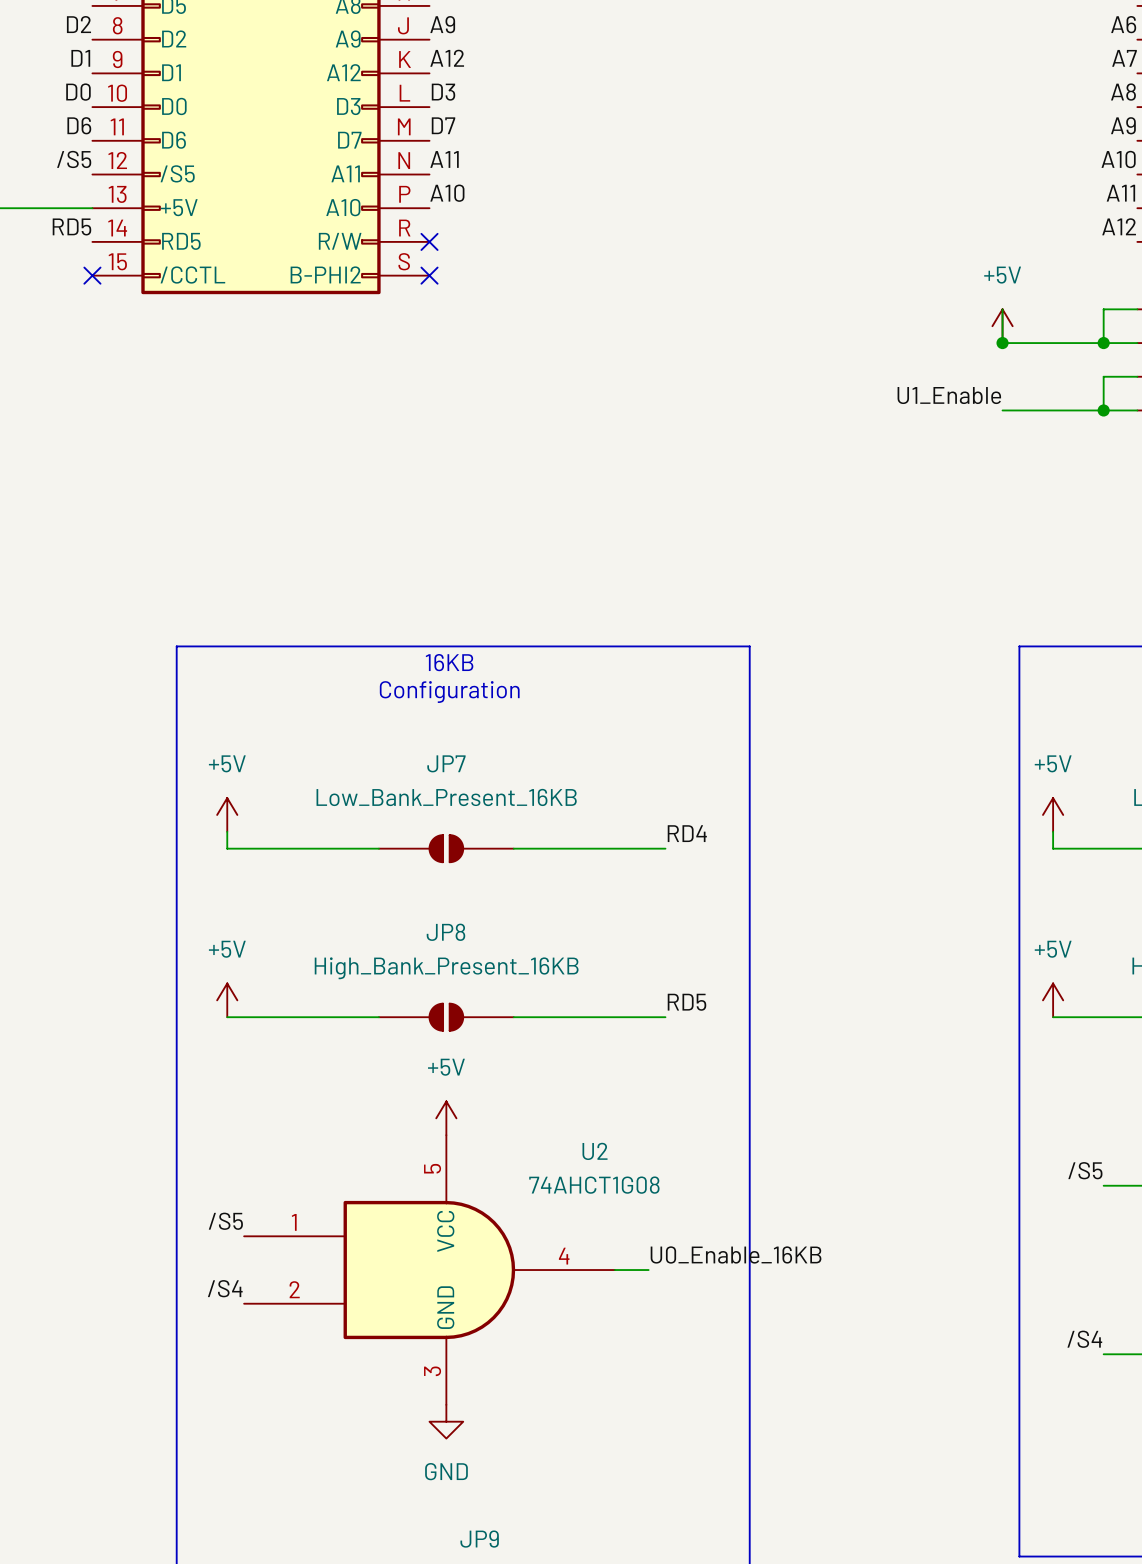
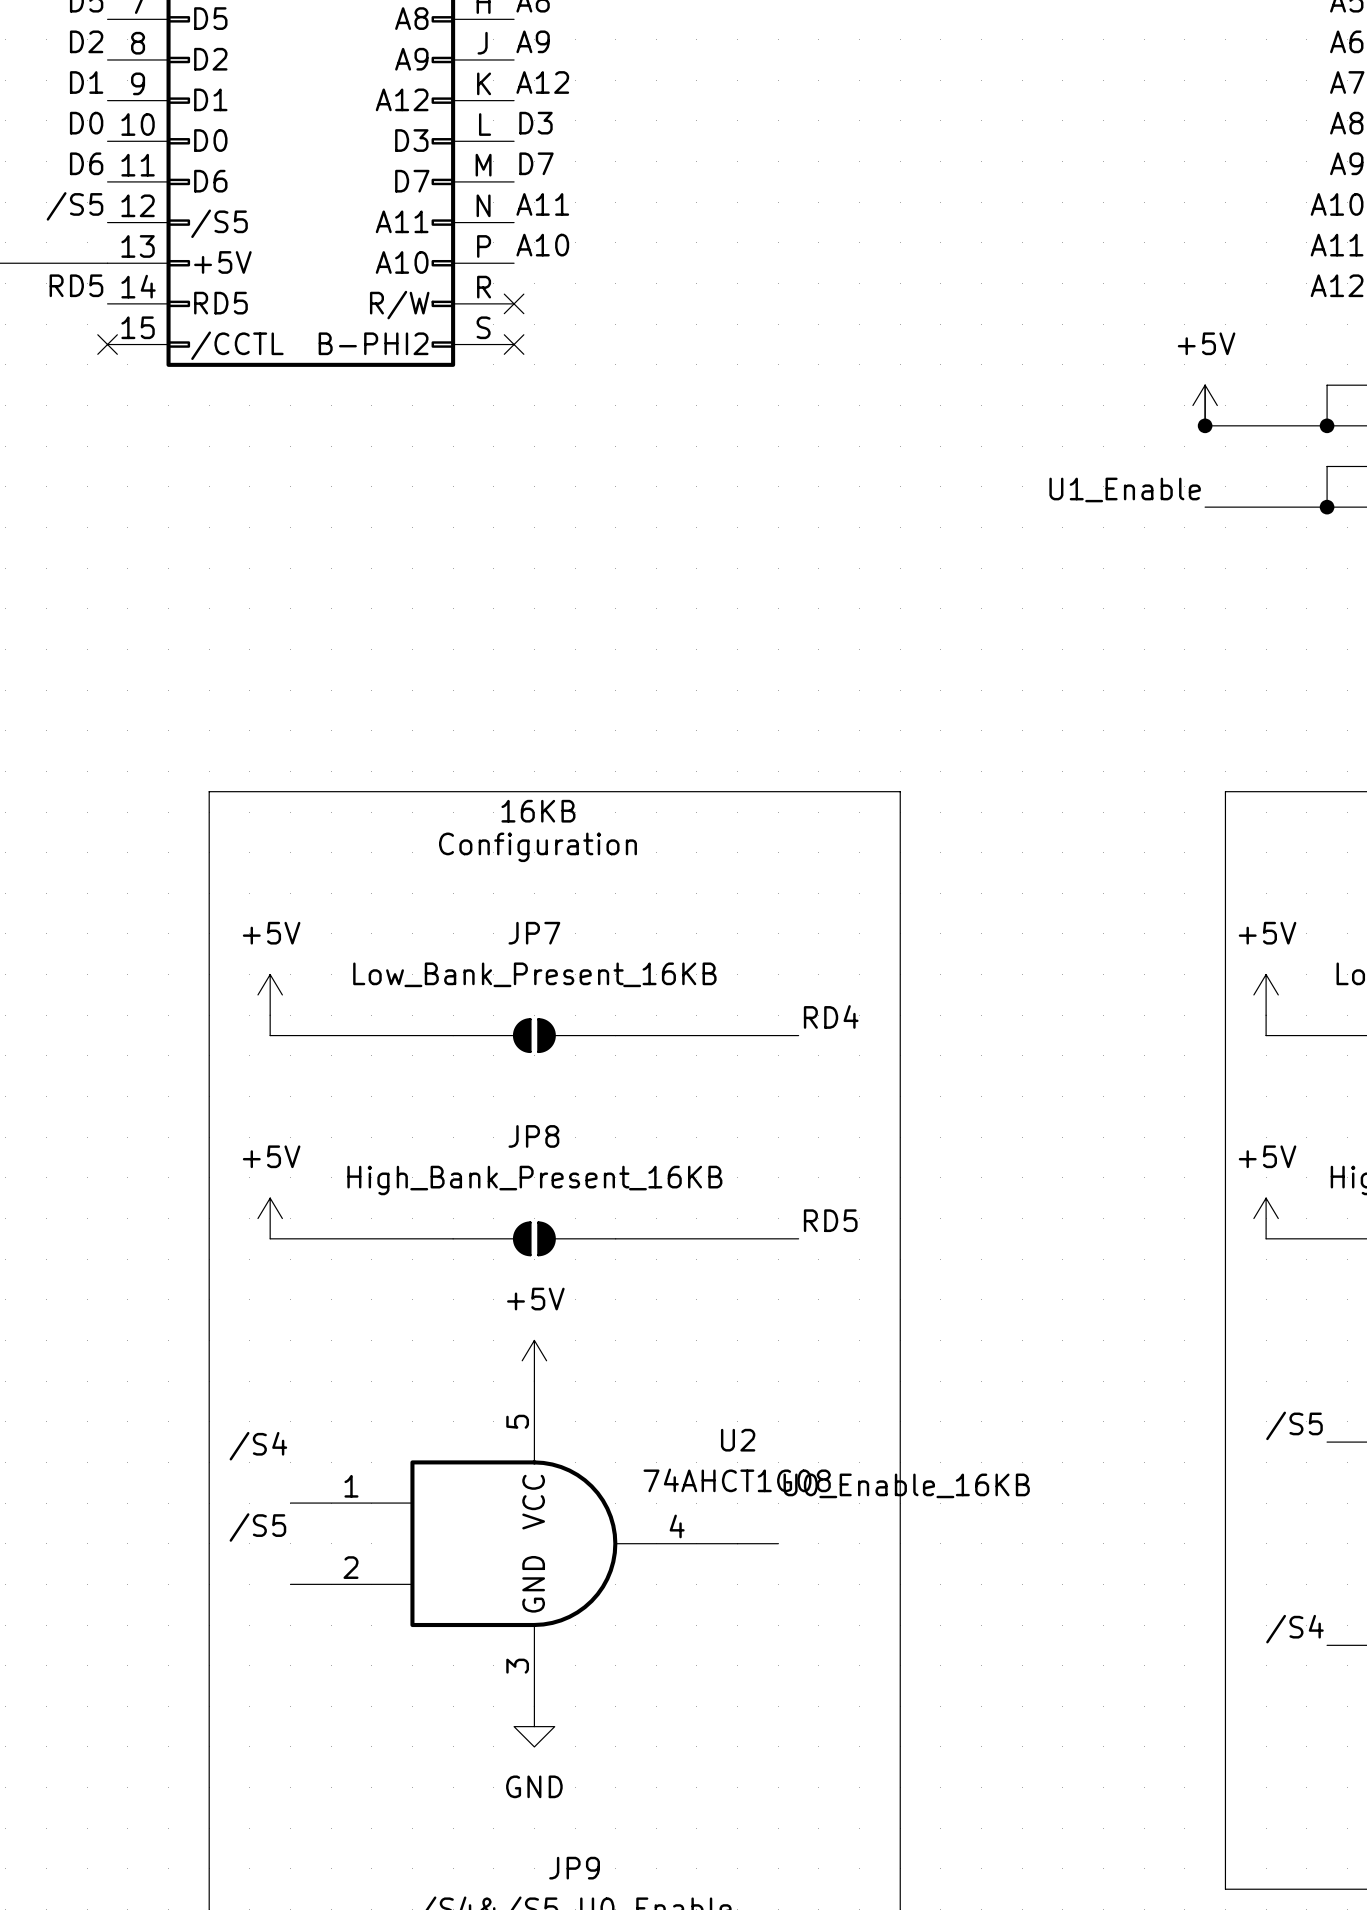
U2 name position: U2 (595, 1151) -> U2 (738, 1440)
U2 value position: 74AHCT1G08 (594, 1185) -> 74AHCT1G08 (737, 1480)
label position: /S5 (225, 1221) -> /S5 (257, 1527)
label position: U0_Enable_16KB (736, 1254) -> U0_Enable_16KB (906, 1485)
label position: /S4 (225, 1288) -> /S4 (258, 1446)

